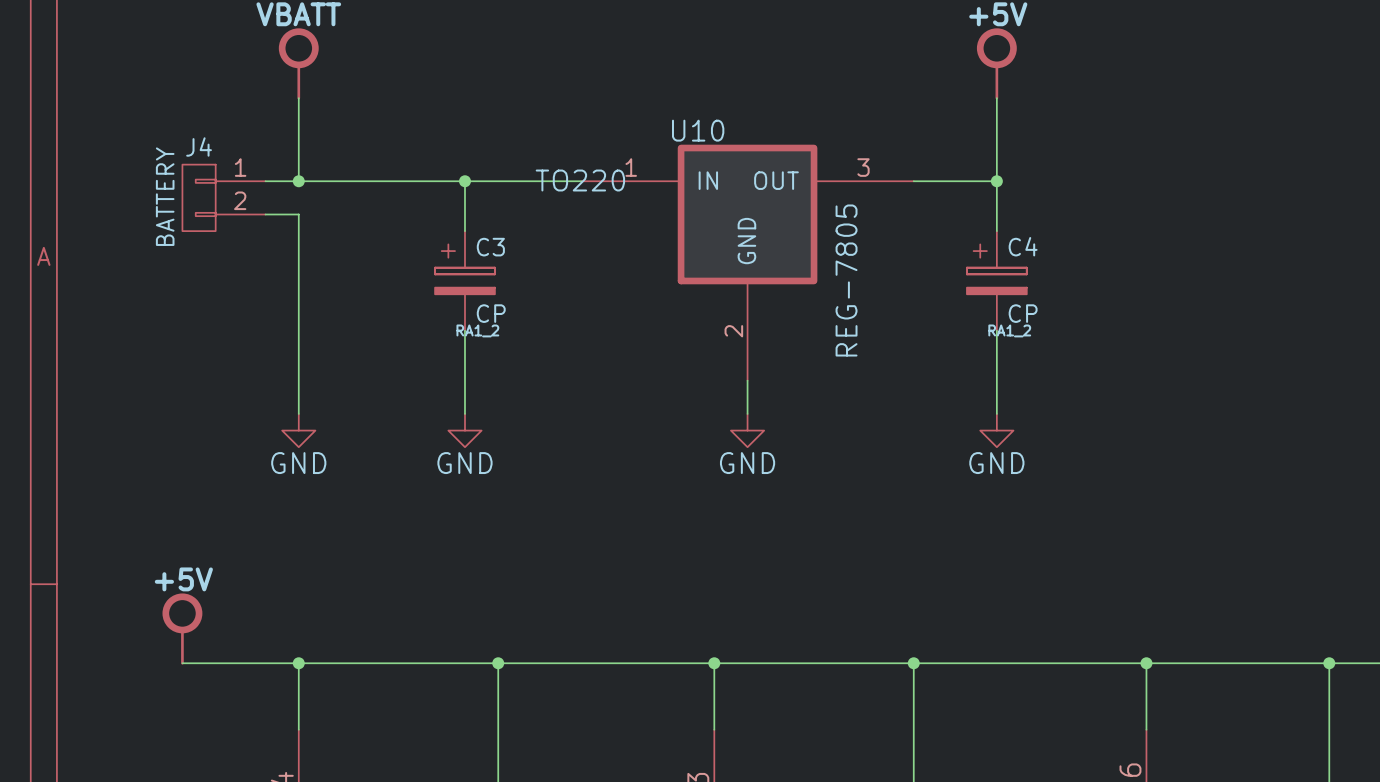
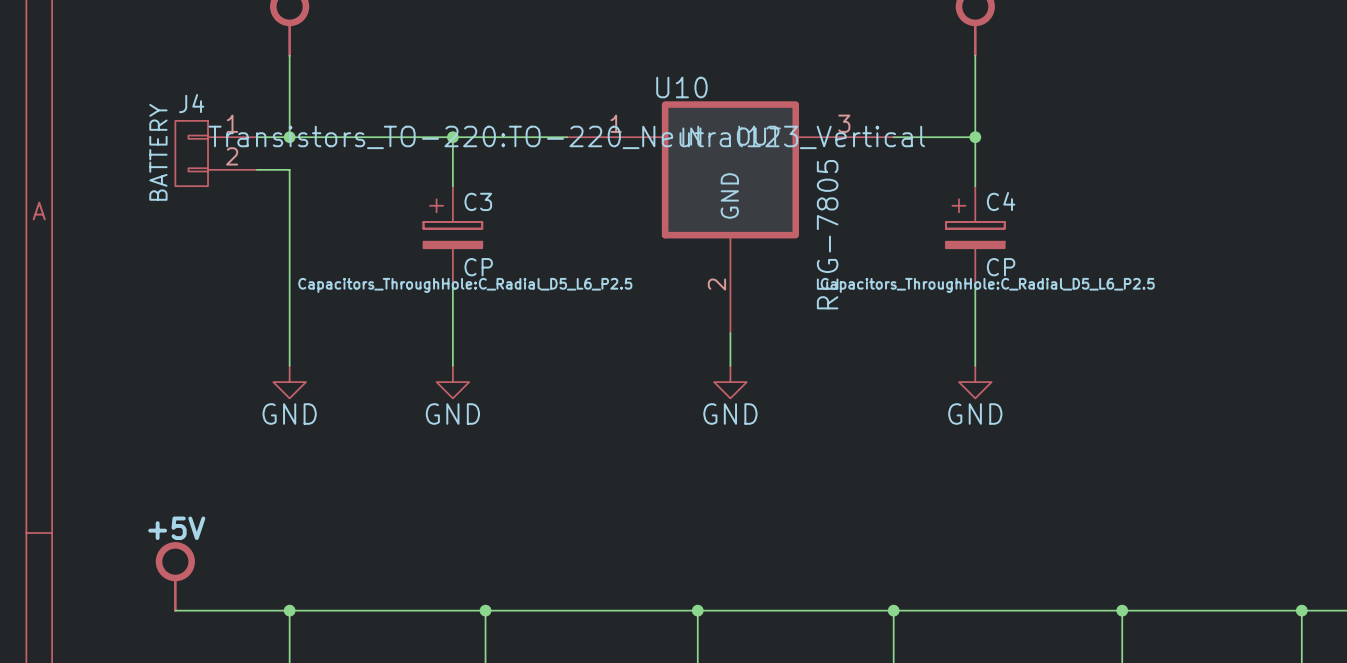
U10 text: TO220 (580, 180) -> Transistors_TO-220:TO-220_Neutral123_Vertical (566, 137)
C3 text: RA1_2 (477, 330) -> Capacitors_ThroughHole:C_Radial_D5_L6_P2.5 (465, 285)
C4 text: RA1_2 (1009, 330) -> Capacitors_ThroughHole:C_Radial_D5_L6_P2.5 (987, 285)

